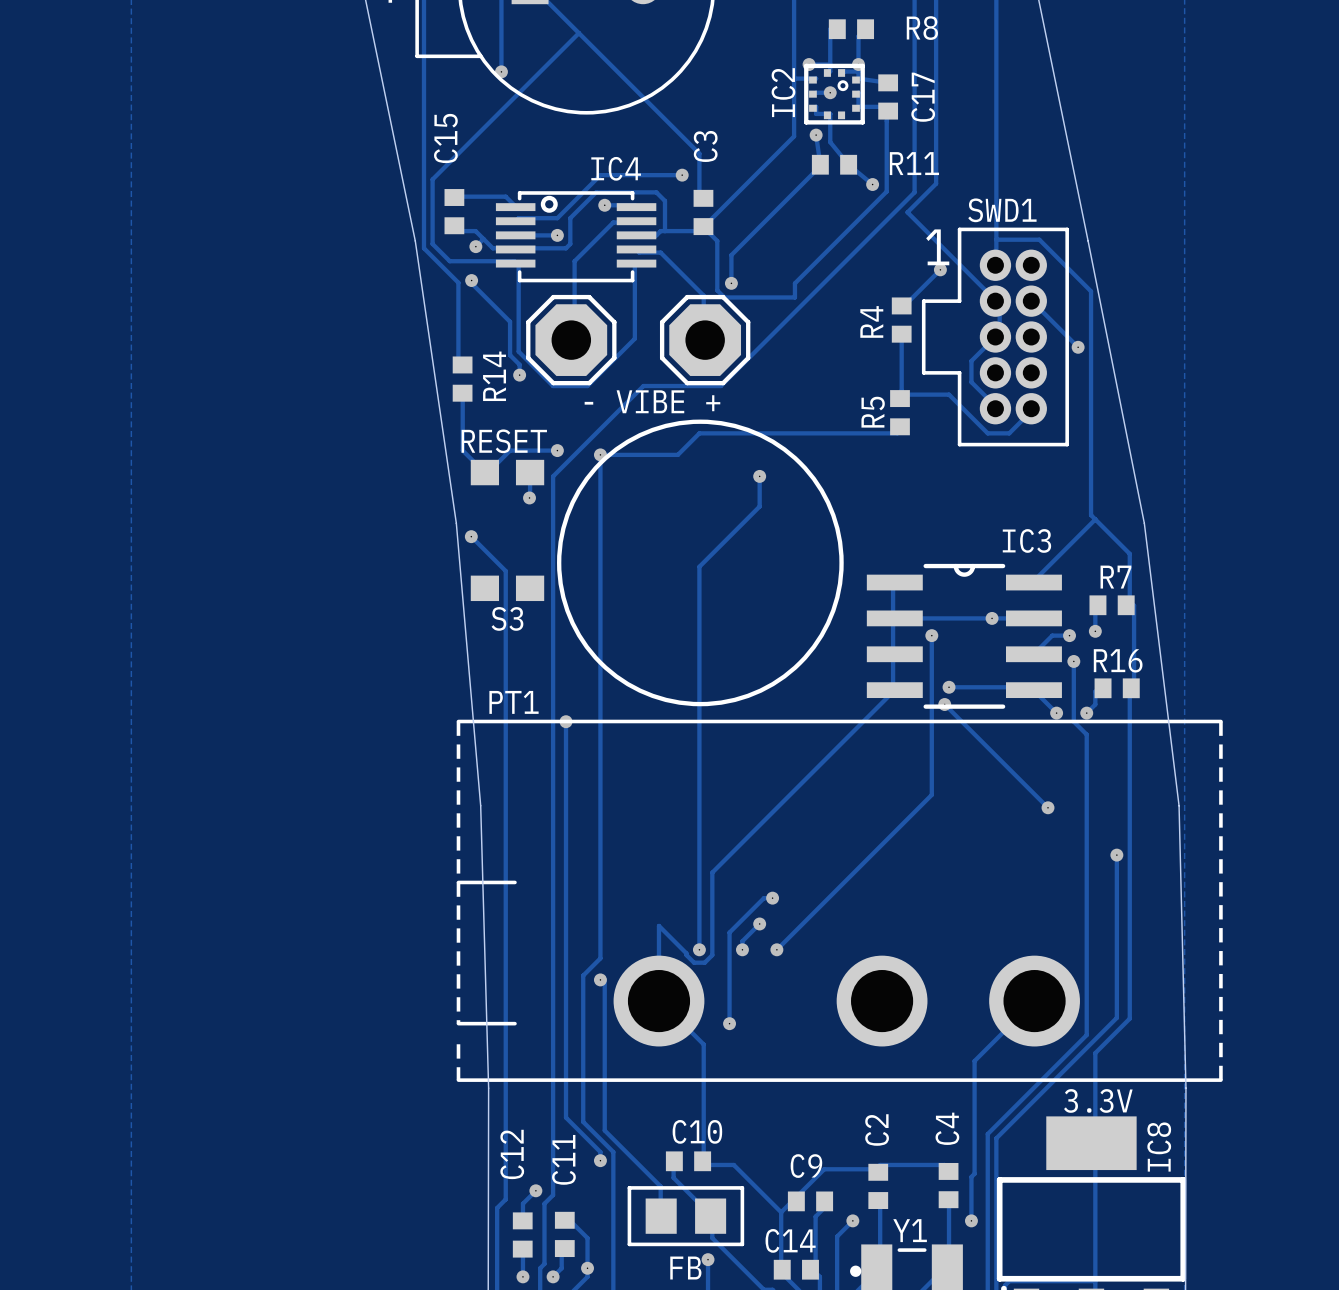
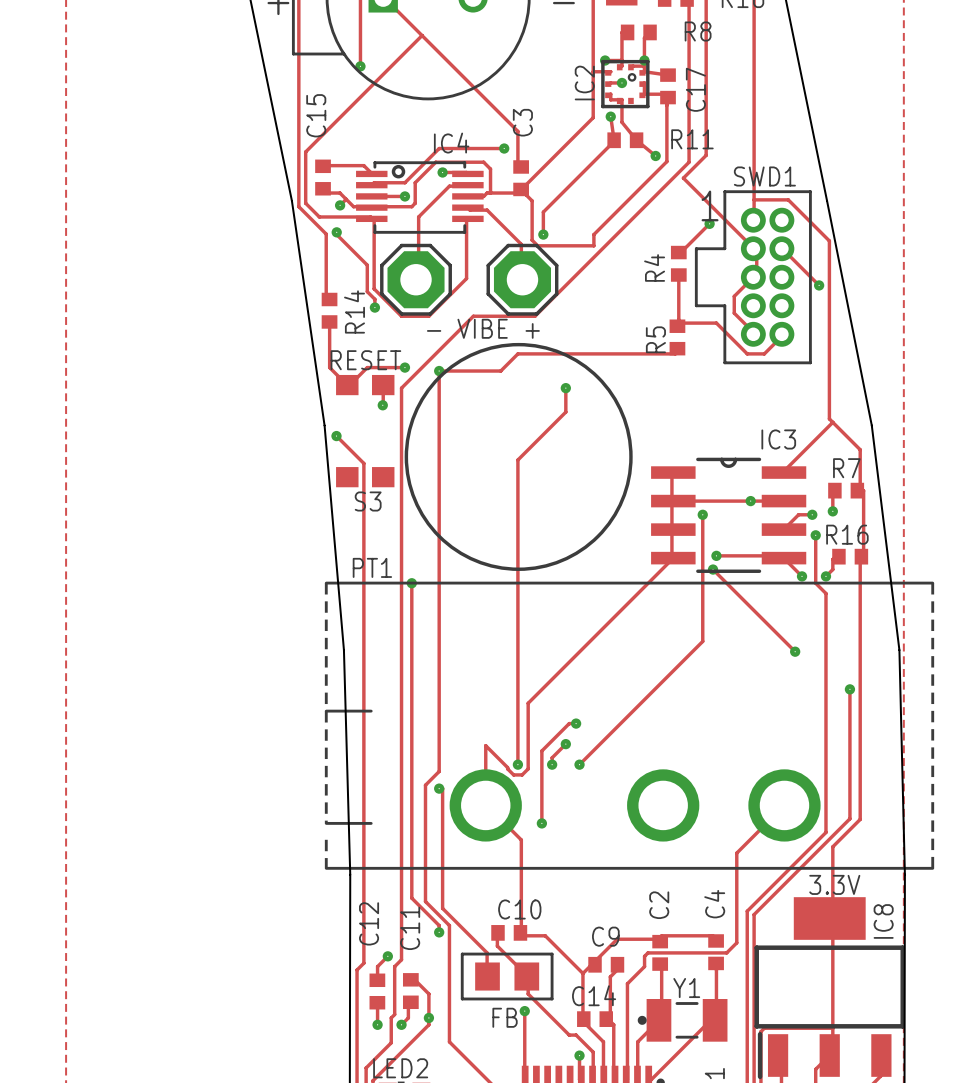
track: (971, 1176) (971, 1220) -> none
track: (852, 1220) (837, 1236) -> (734, 945) (726, 952) (647, 952) (644, 956) (644, 966) (627, 983) (627, 992)
via: (852, 1220) -> none
via: (971, 1220) -> none

